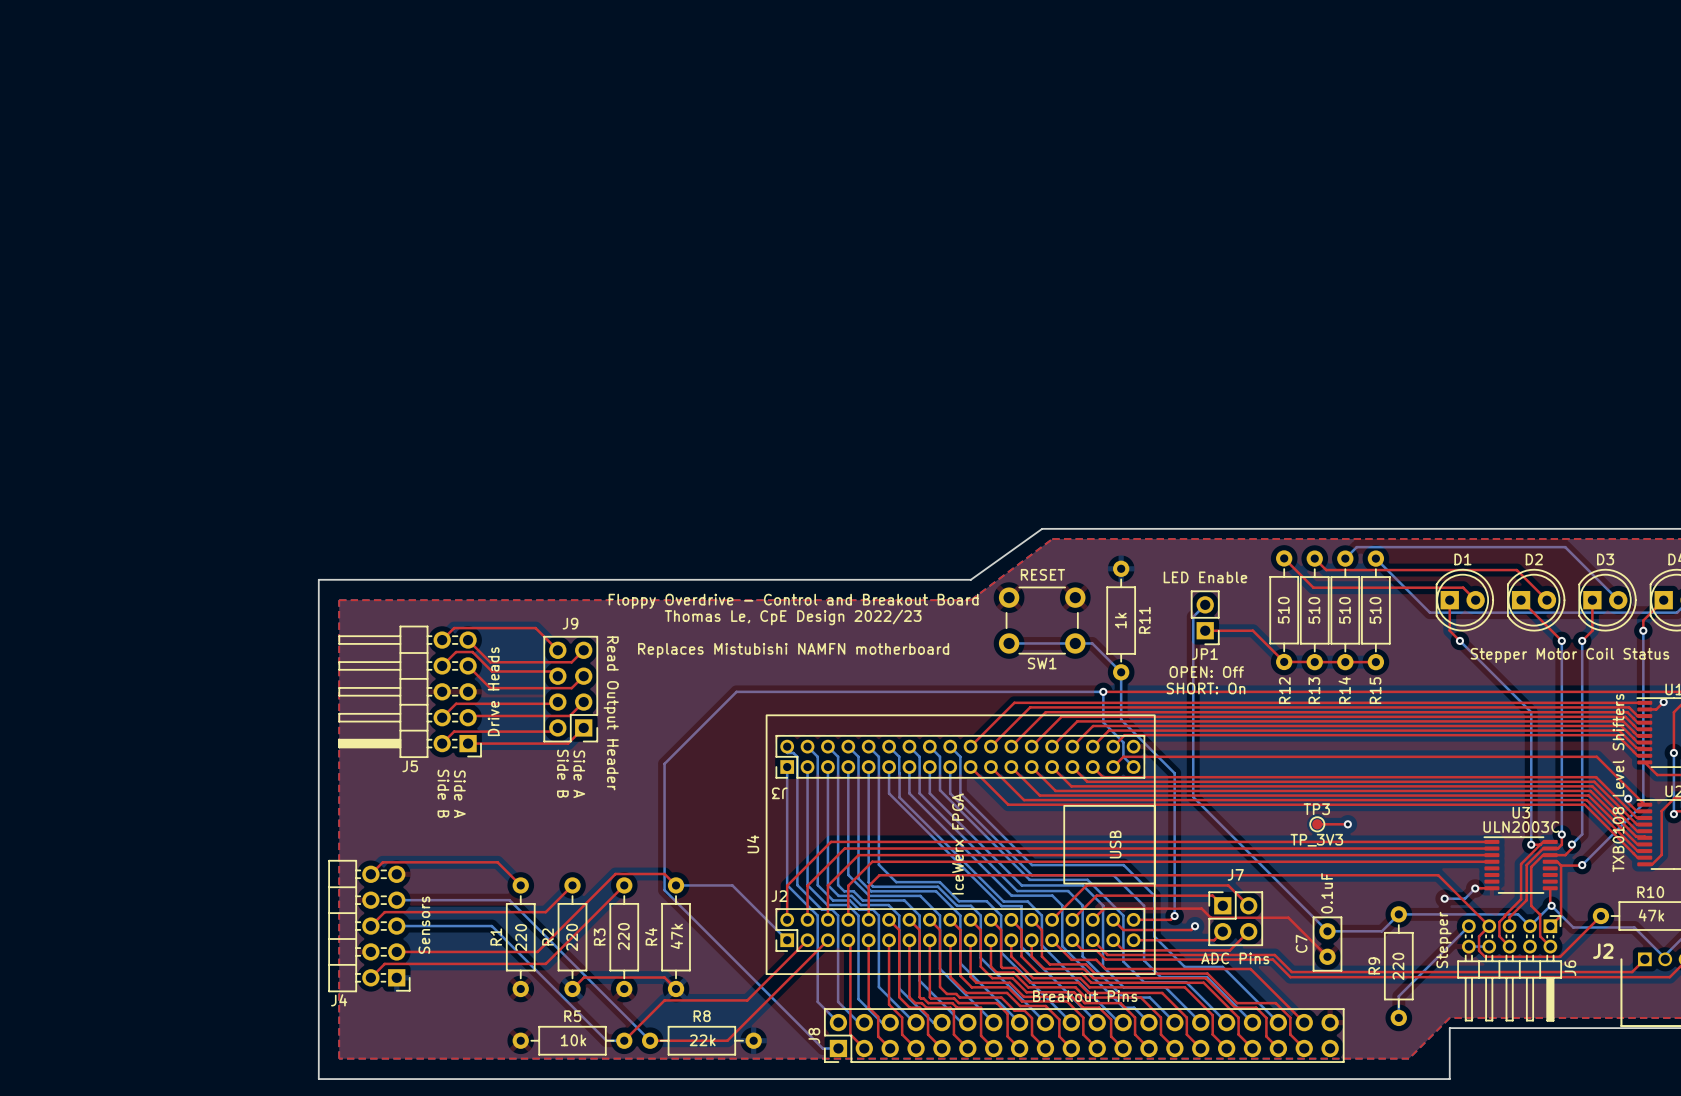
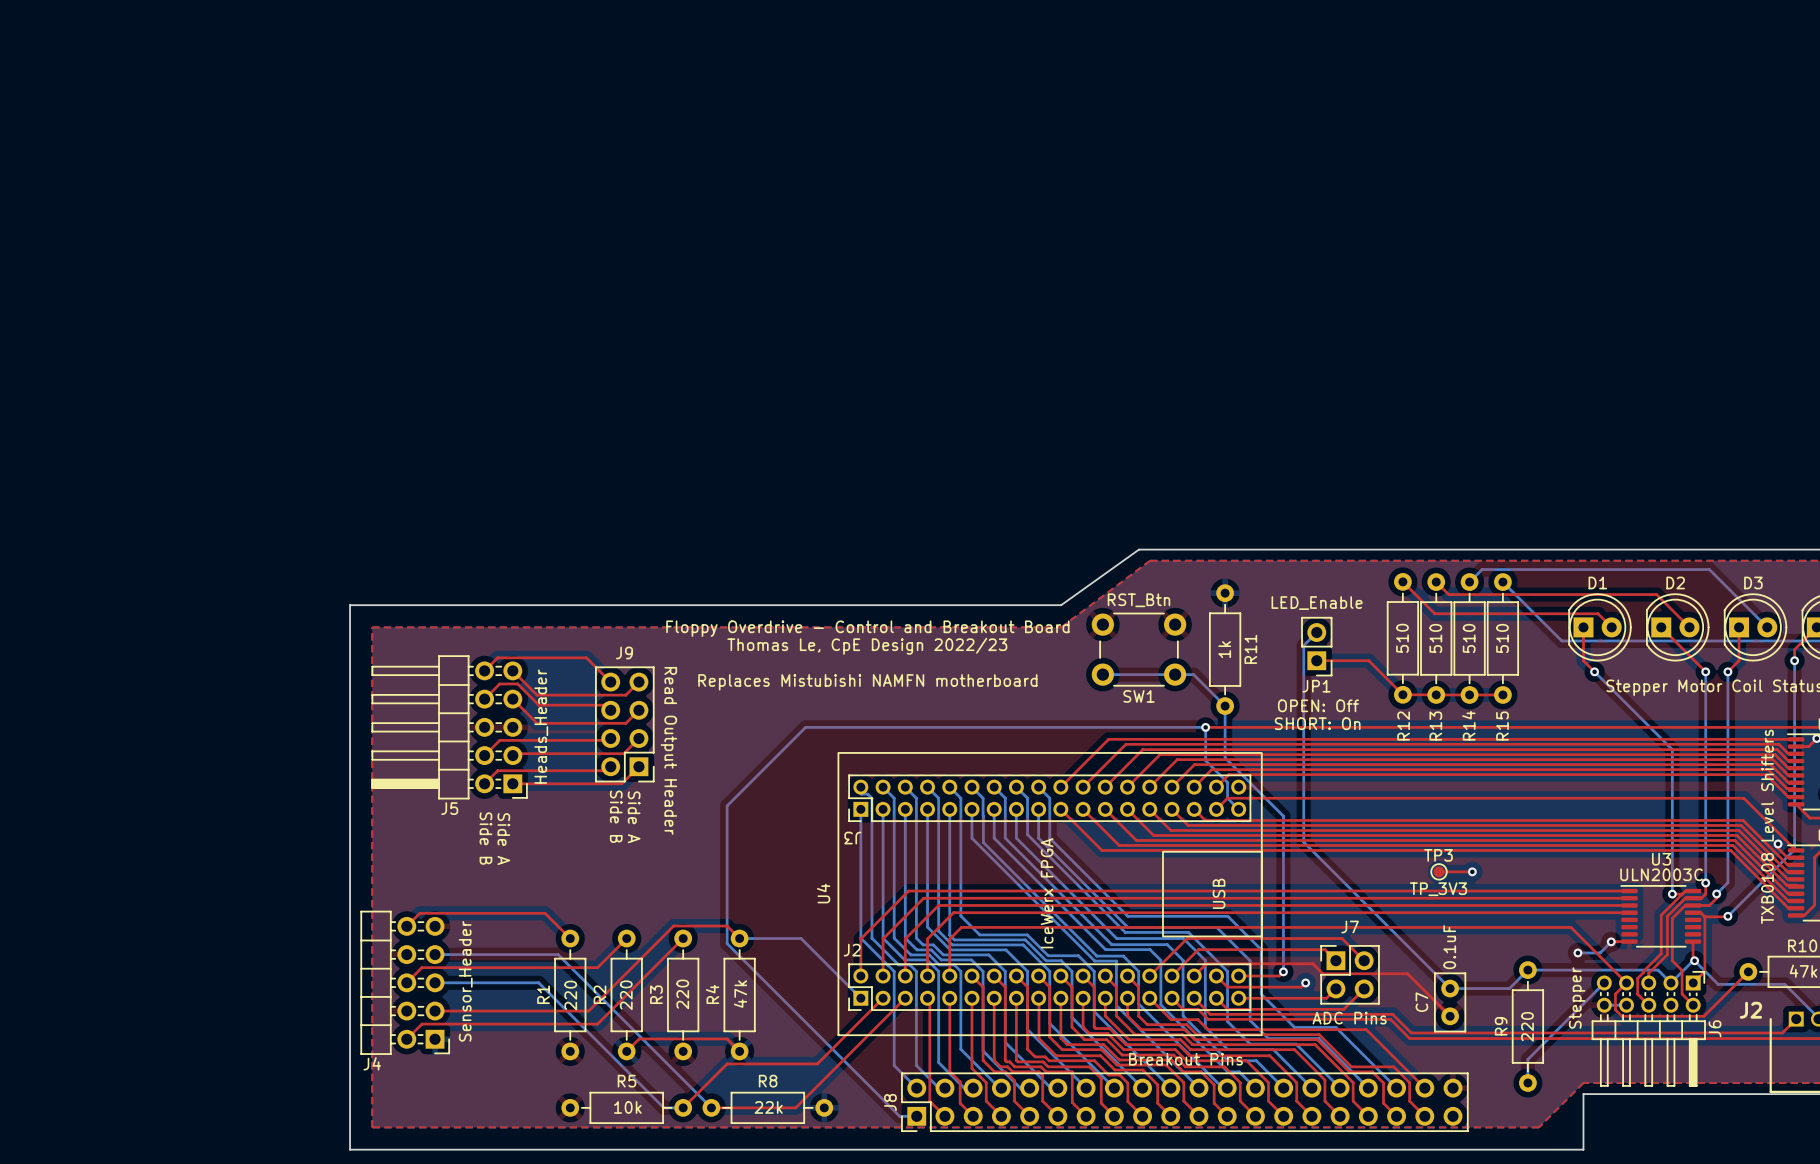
SW1 value: RESET (1042, 574) -> RST_Btn (1138, 600)
JP1 value: LED Enable (1205, 577) -> LED_Enable (1317, 603)
J5 value: Drive Heads (493, 691) -> Heads_Header (541, 726)
J4 value: Sensors (424, 925) -> Sensor_Header (465, 981)

